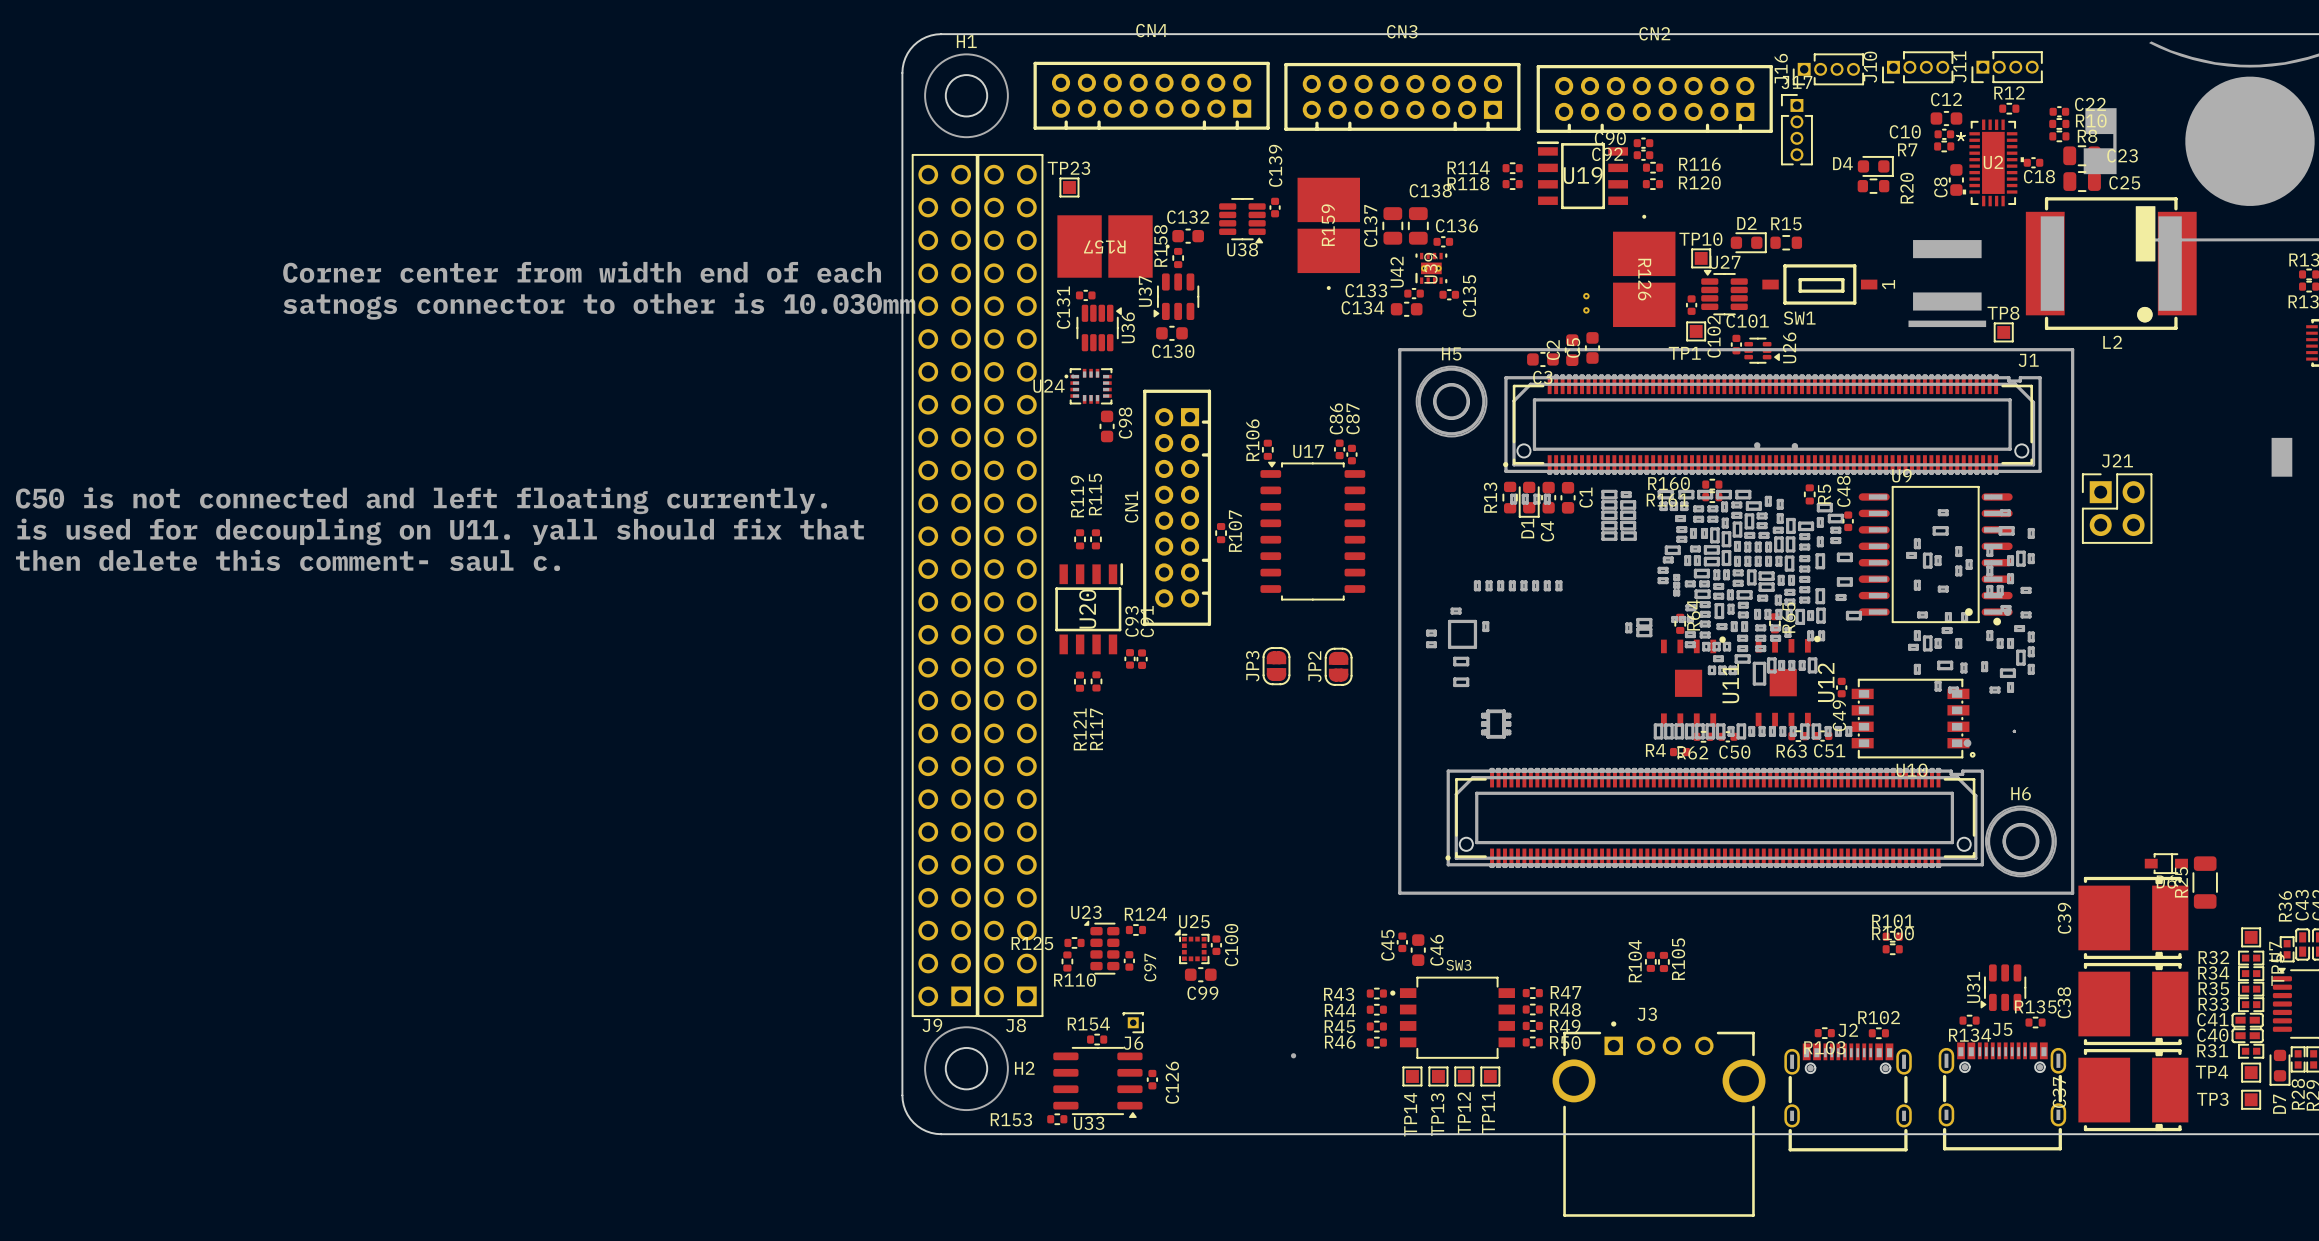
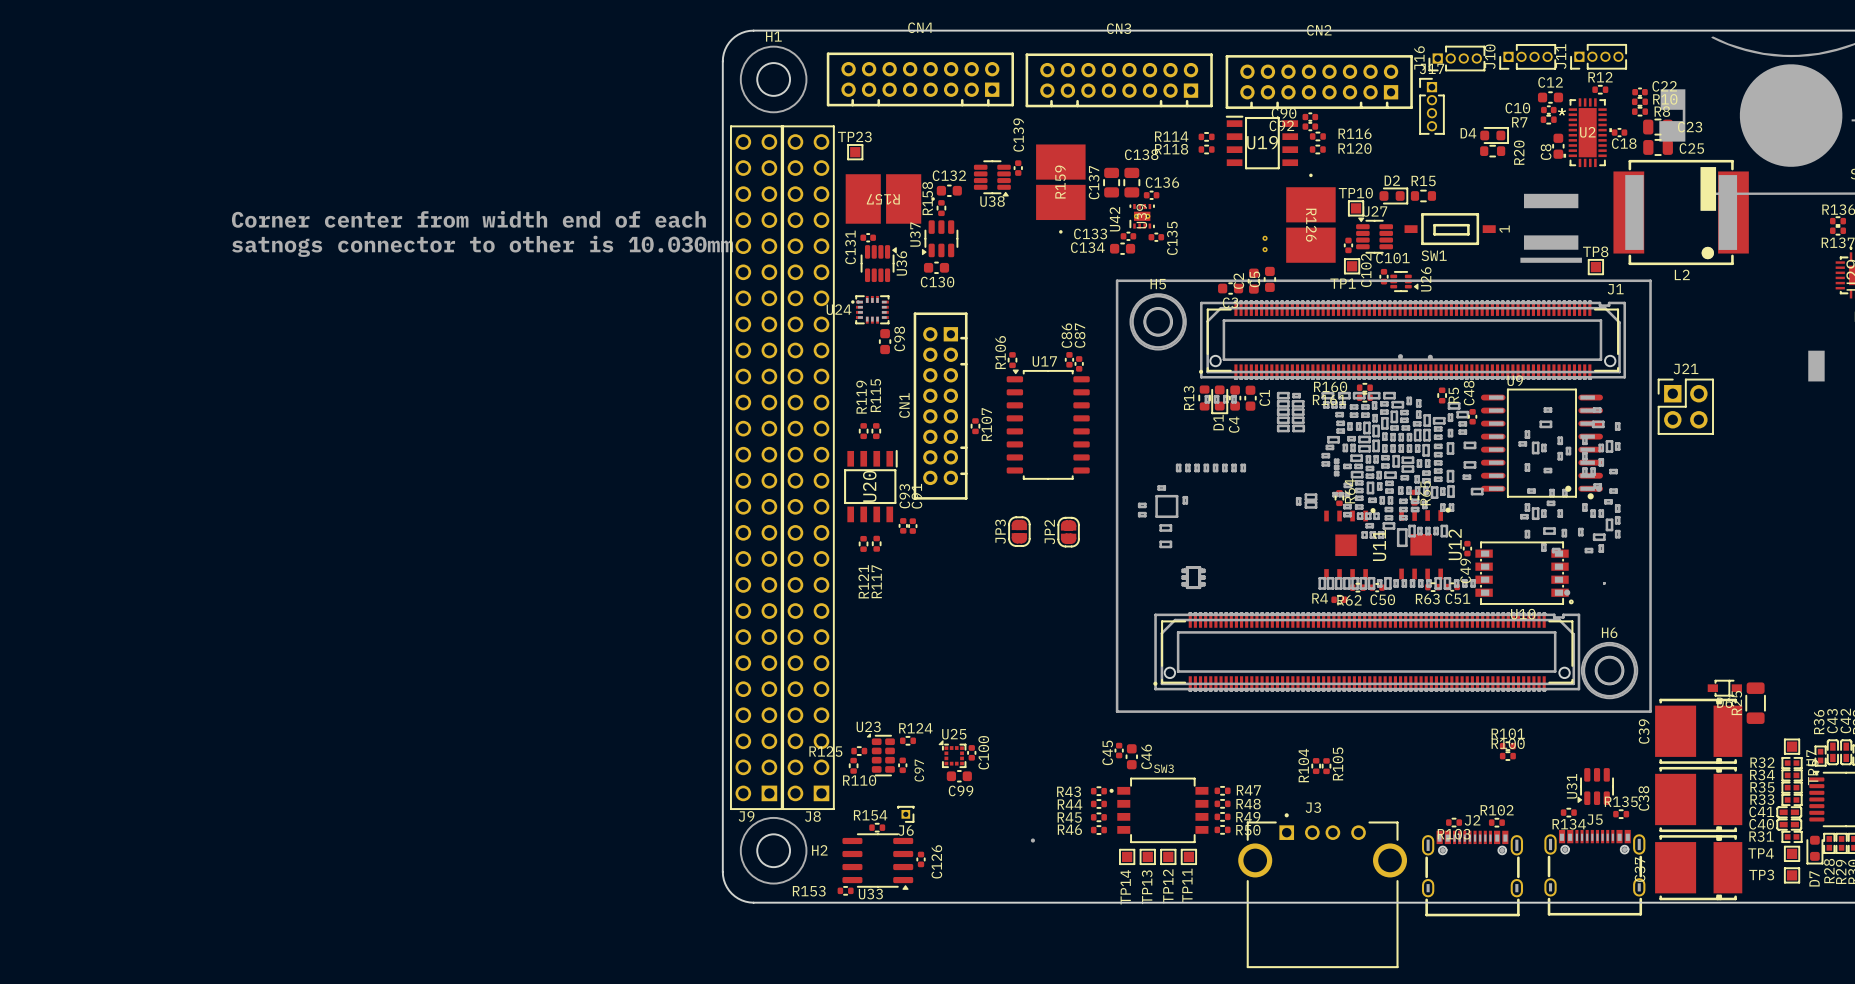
text: C50 is not connected and left floating currently. (421, 500) -> none
text: is used for decoupling on U11. yall should fix that (440, 531) -> none
text: then delete this comment- saul c. (288, 560) -> none

